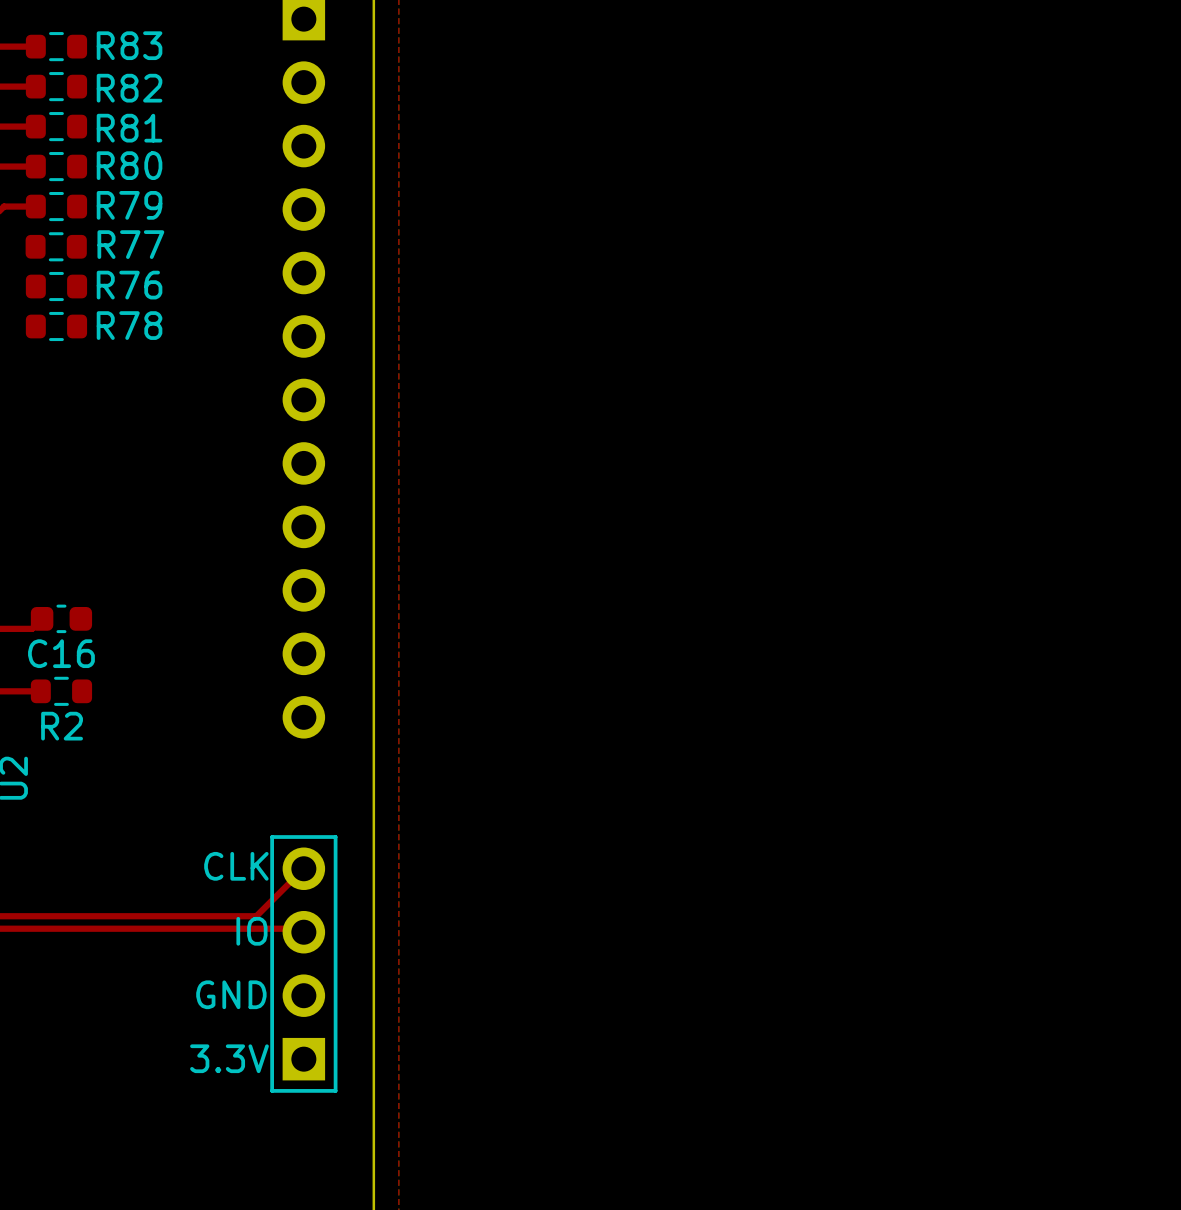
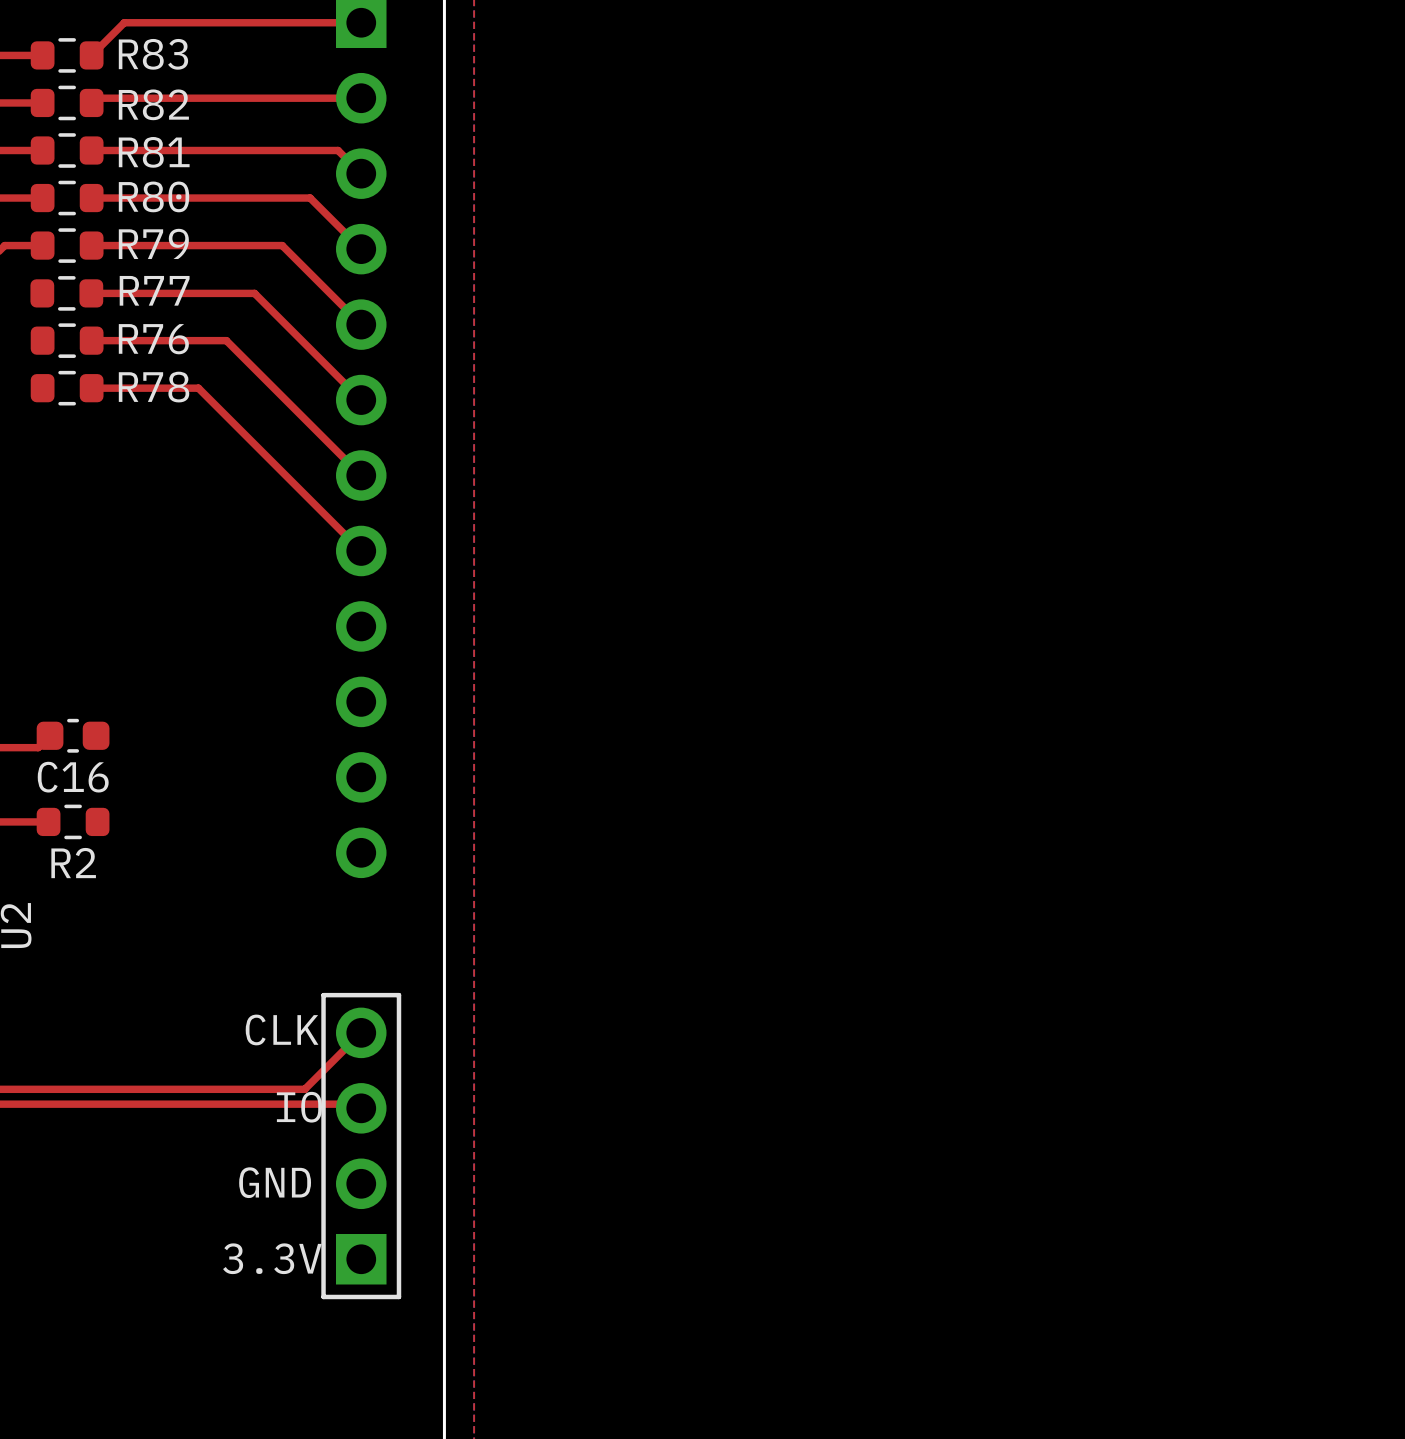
top track: none -> (361, 22) (124, 22) (91, 55)
top track: none -> (361, 98) (96, 98) (91, 102)
top track: none -> (91, 150) (338, 150) (361, 173)
top track: none -> (91, 198) (310, 198) (361, 249)
top track: none -> (91, 245) (282, 245) (361, 324)
top track: none -> (91, 293) (254, 293) (361, 400)
top track: none -> (91, 340) (226, 340) (361, 475)
top track: none -> (91, 388) (198, 388) (361, 550)

